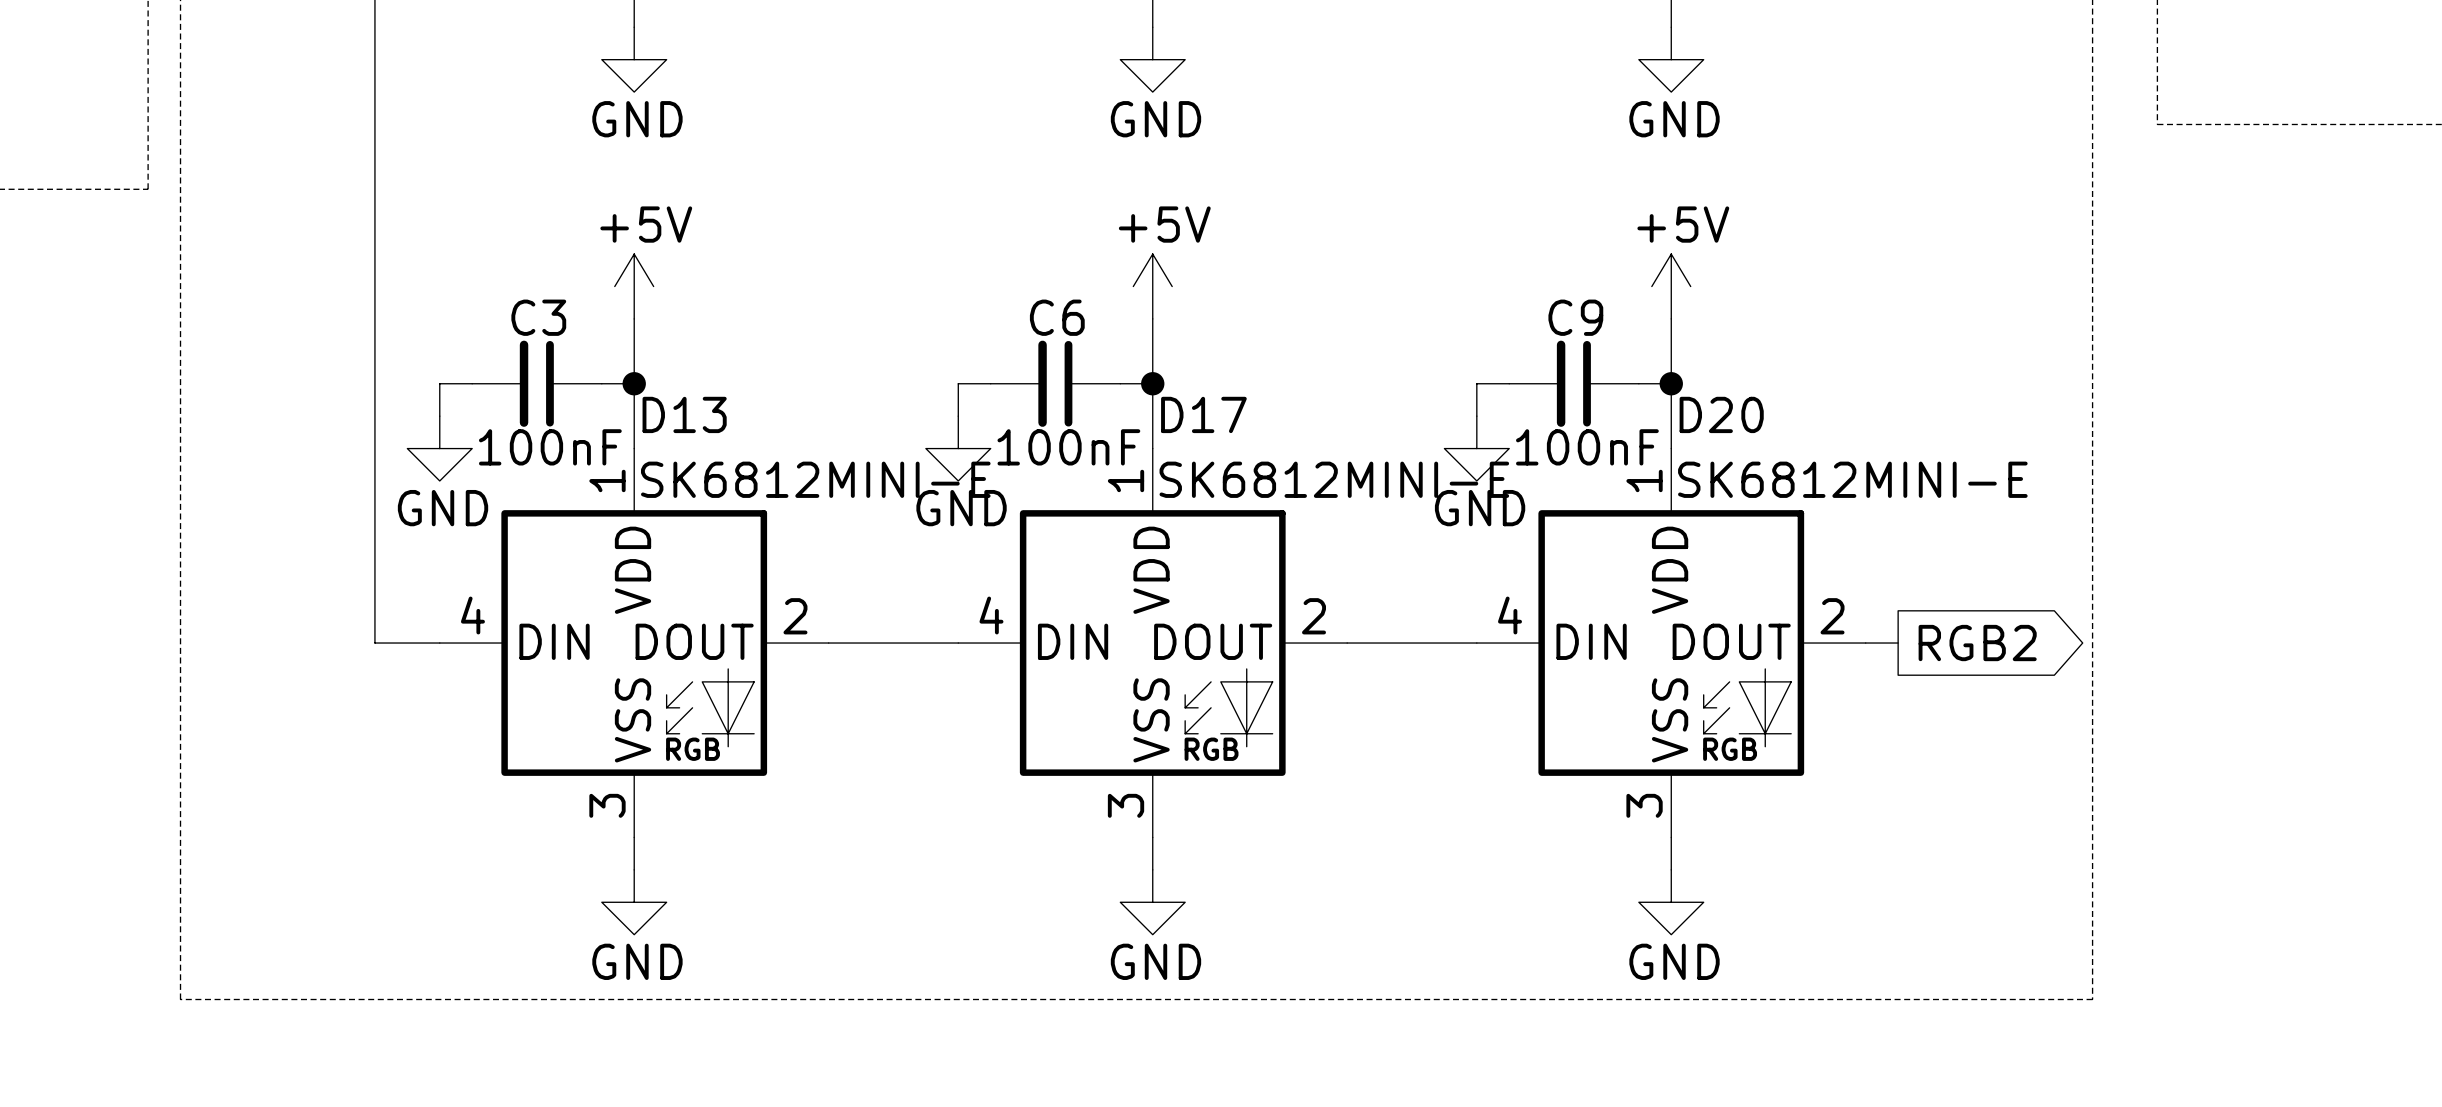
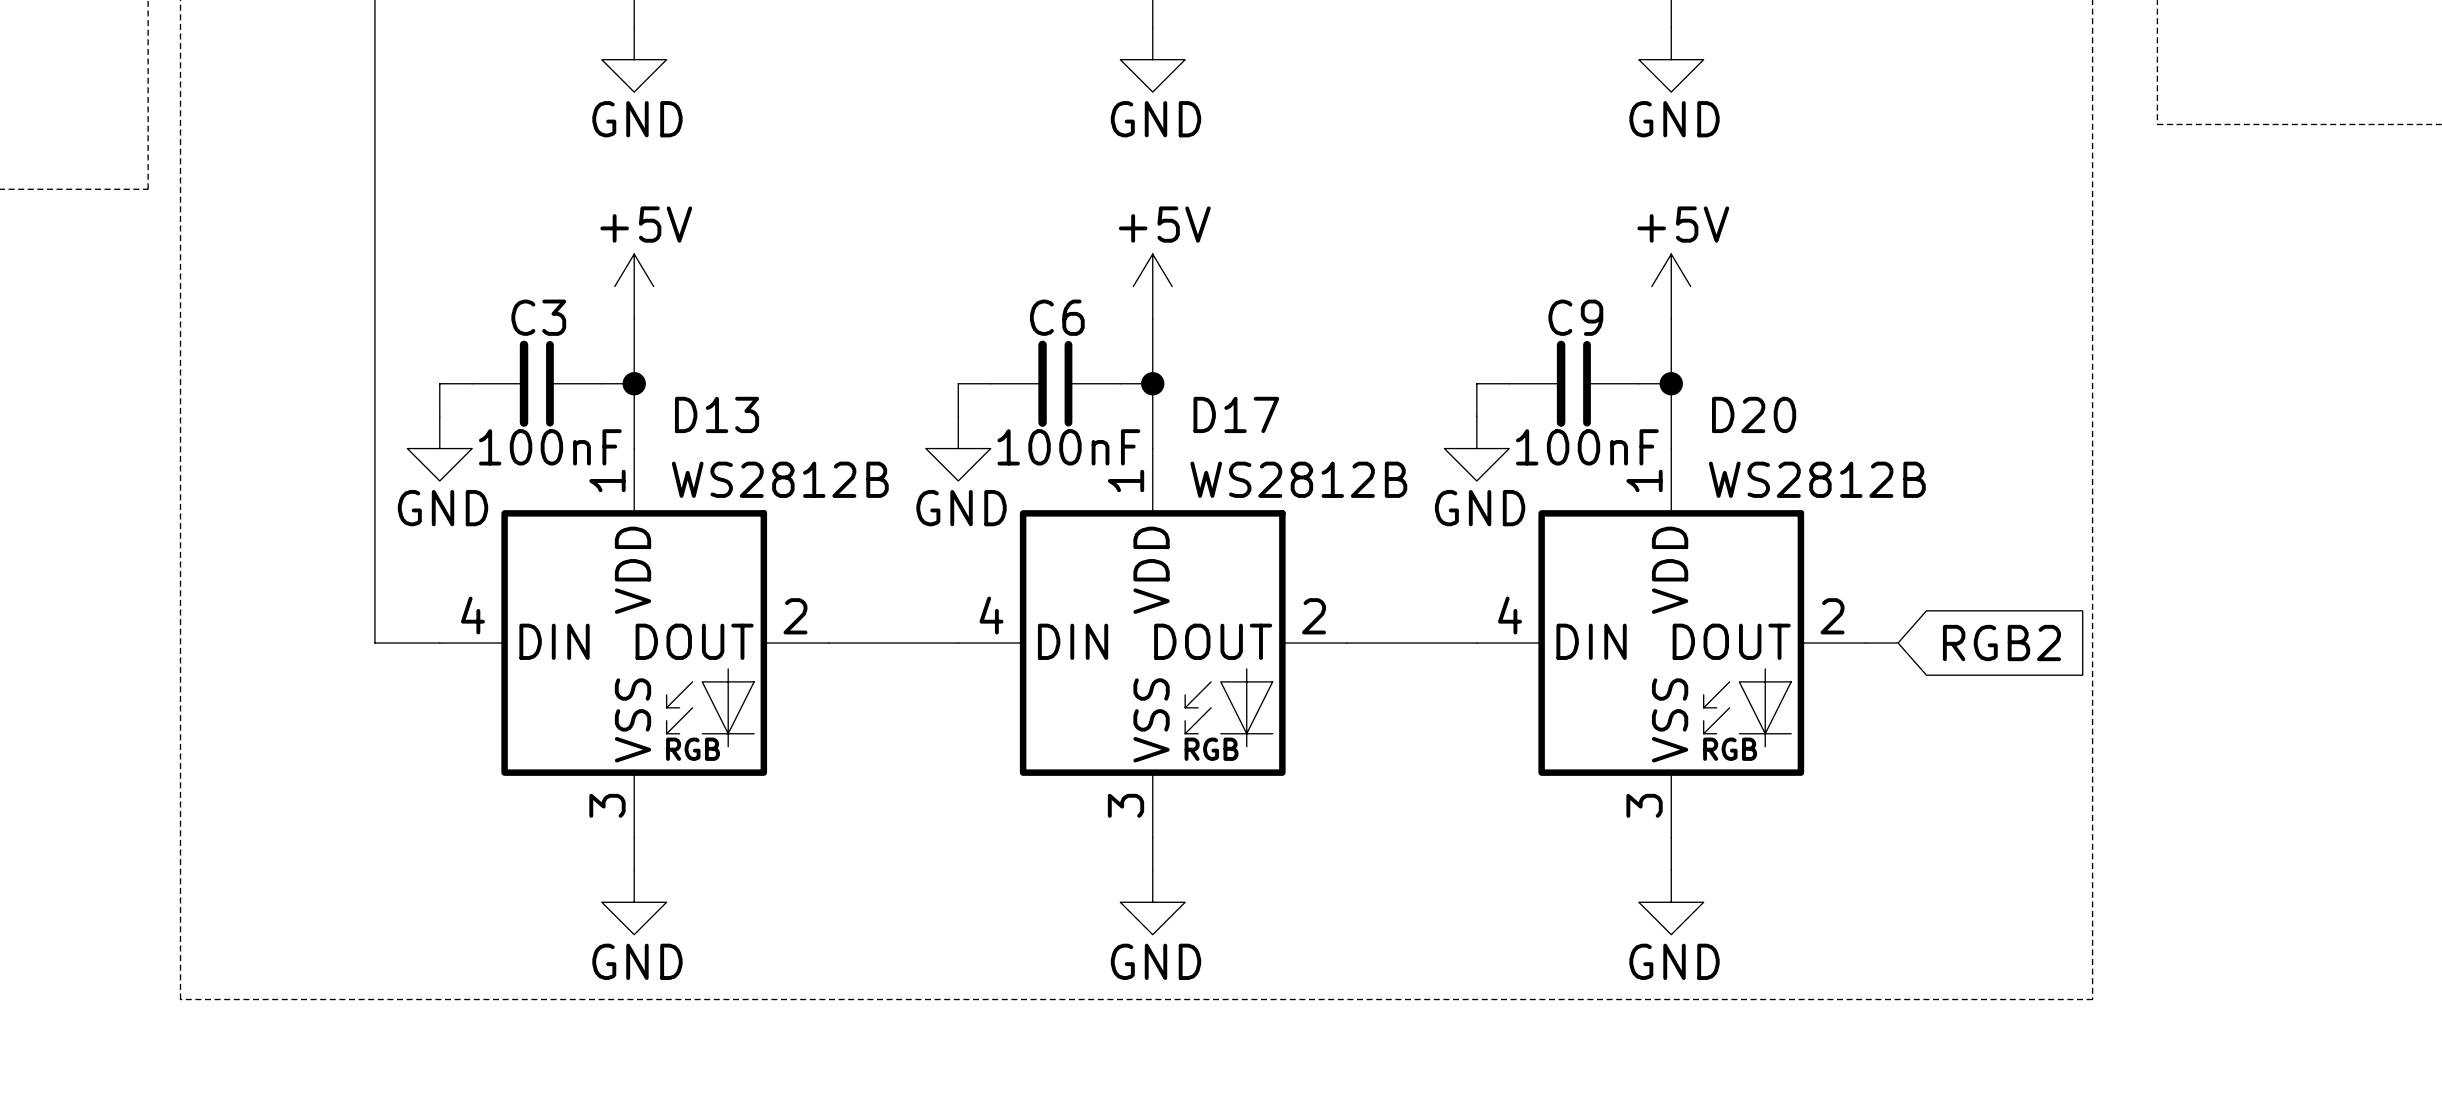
D13 name position: D13 (684, 414) -> D13 (717, 414)
D17 name position: D17 (1203, 414) -> D17 (1236, 414)
D20 name position: D20 (1721, 414) -> D20 (1754, 414)
D13 value: SK6812MINI-E (815, 479) -> WS2812B (780, 479)
D17 value: SK6812MINI-E (1334, 479) -> WS2812B (1298, 479)
D20 value: SK6812MINI-E (1852, 479) -> WS2812B (1817, 479)
global label shape: output (1977, 643) -> input (2001, 643)

